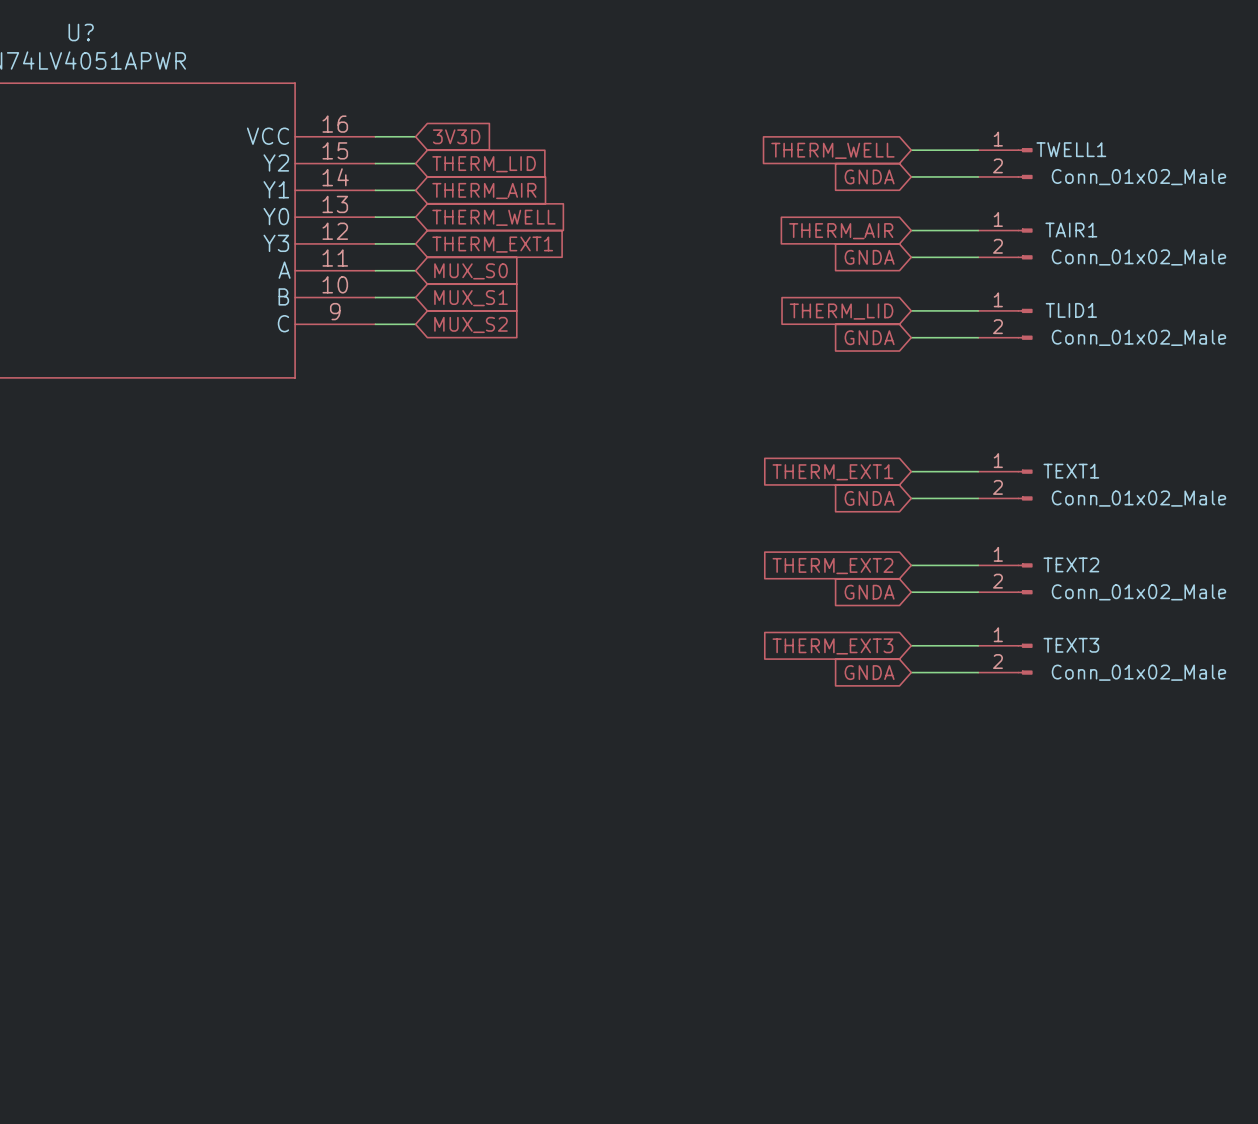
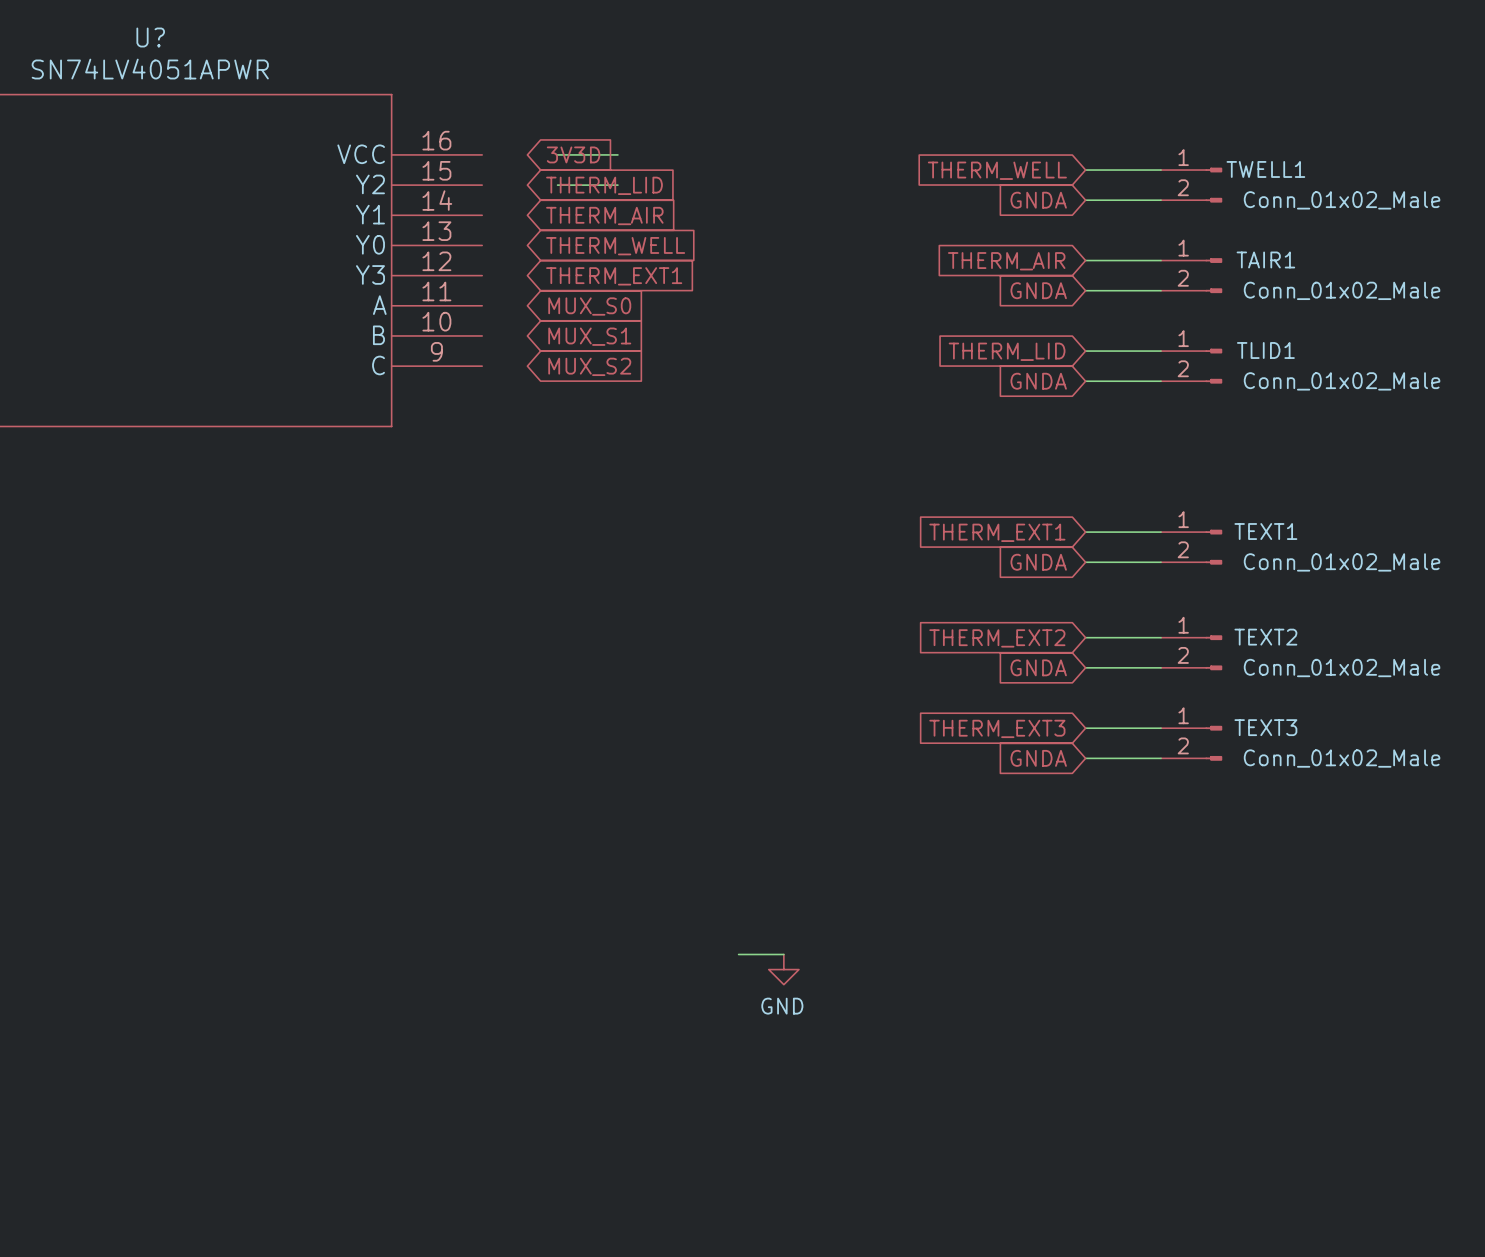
wire: (375, 136) (415, 136) -> none
wire: none -> (557, 154) (617, 154)
wire: (375, 163) (415, 163) -> none
wire: none -> (557, 185) (617, 185)
wire: (375, 190) (415, 190) -> none
wire: (375, 217) (415, 217) -> none
wire: (375, 243) (415, 243) -> none
wire: (375, 270) (415, 270) -> none
wire: (375, 297) (415, 297) -> none
wire: (375, 324) (415, 324) -> none
wire: none -> (738, 954) (783, 954)
power symbol: none -> GND (783, 969)

